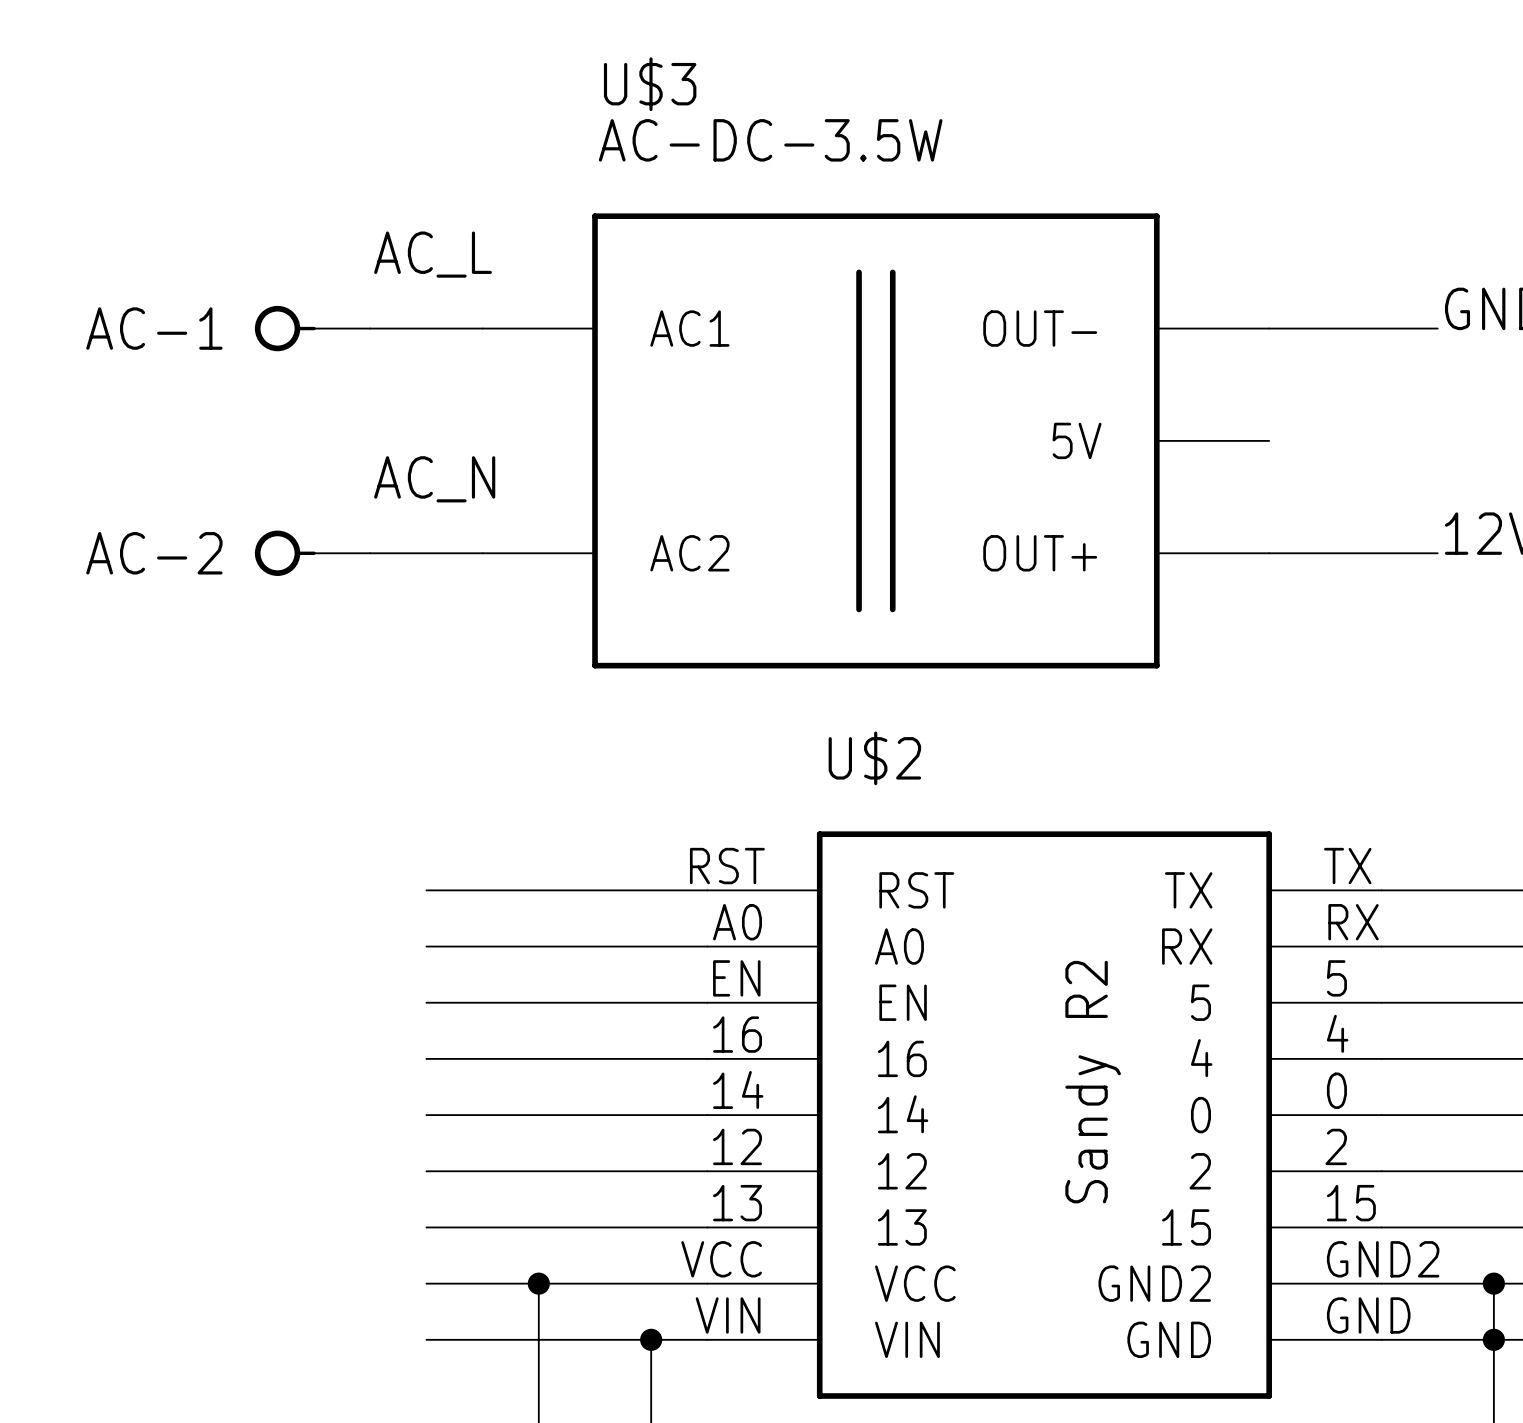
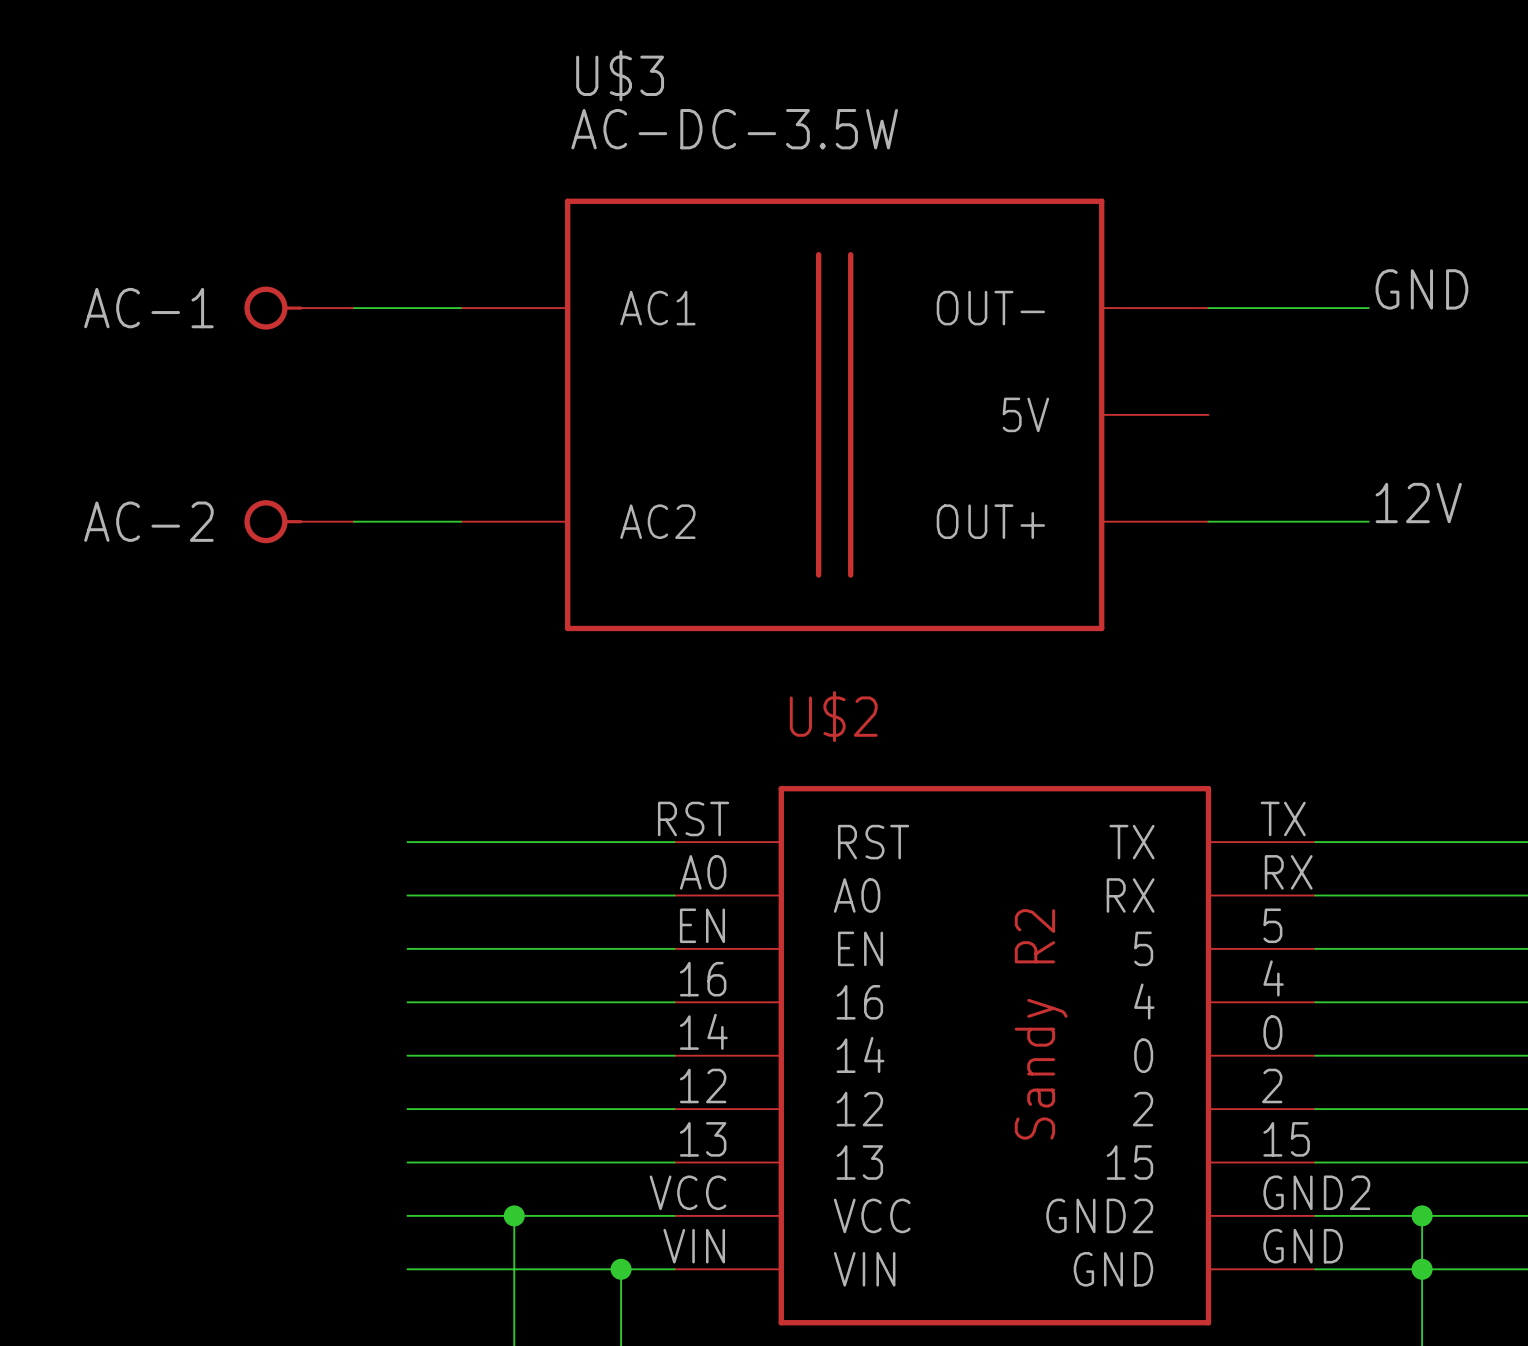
label: AC_L (433, 254) -> none
label: AC_N (434, 479) -> none

